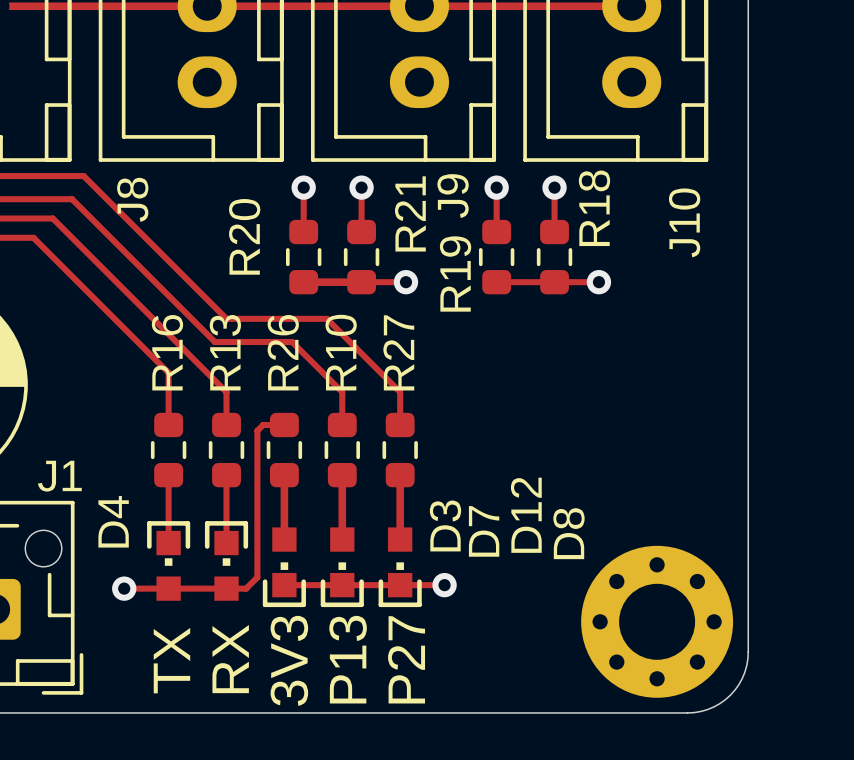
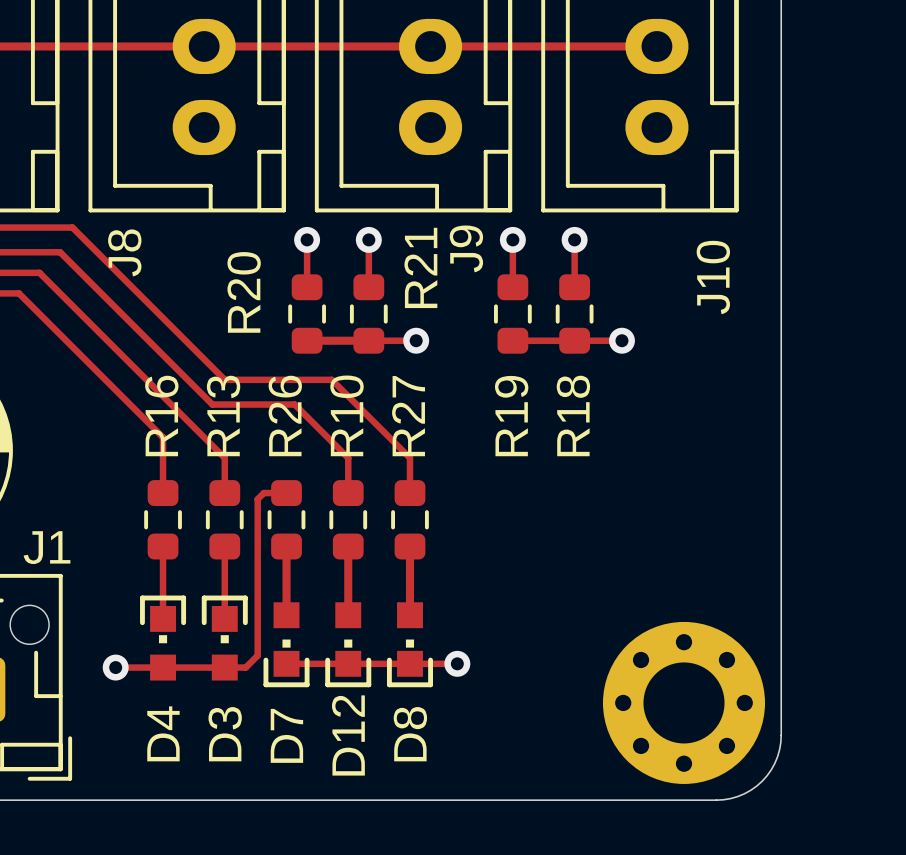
R18 name position: R18 (594, 208) -> R18 (573, 415)
R19 name position: R19 (455, 273) -> R19 (511, 416)
D12 name position: D12 (526, 515) -> D12 (348, 735)
D4 name position: D4 (113, 521) -> D4 (163, 733)
D3 name position: D3 (445, 525) -> D3 (225, 734)
D7 name position: D7 (484, 531) -> D7 (286, 735)
D8 name position: D8 (568, 533) -> D8 (410, 734)
text: RX (230, 659) -> none
text: P13 (348, 659) -> none
text: P27 (406, 659) -> none
text: TX (171, 660) -> none
text: 3V3 (289, 660) -> none

